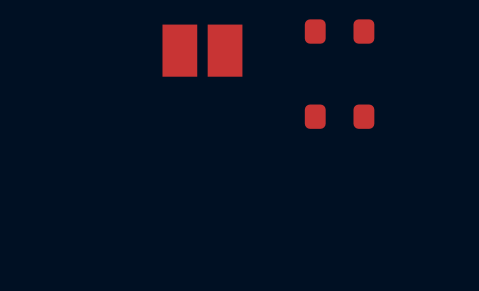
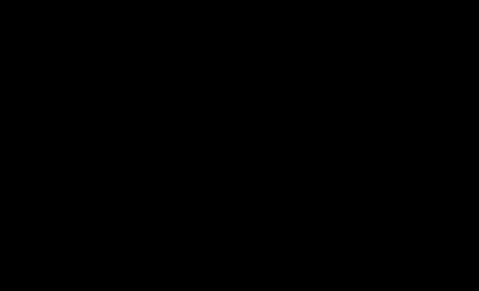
part: (339, 31) -> none
part: (202, 50) -> none
part: (339, 116) -> none

